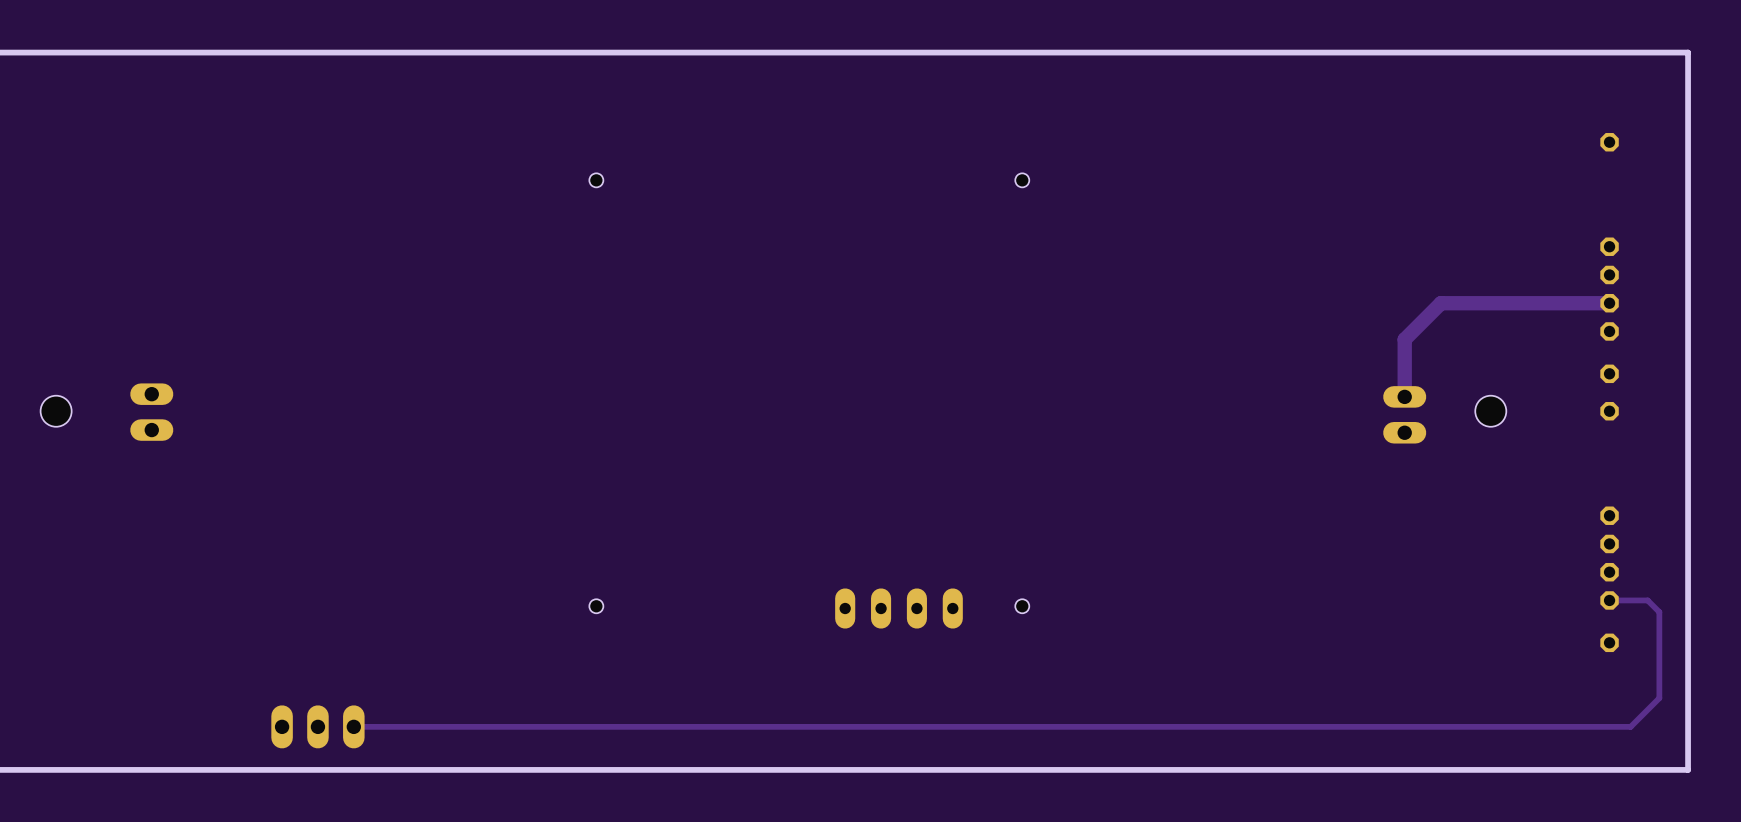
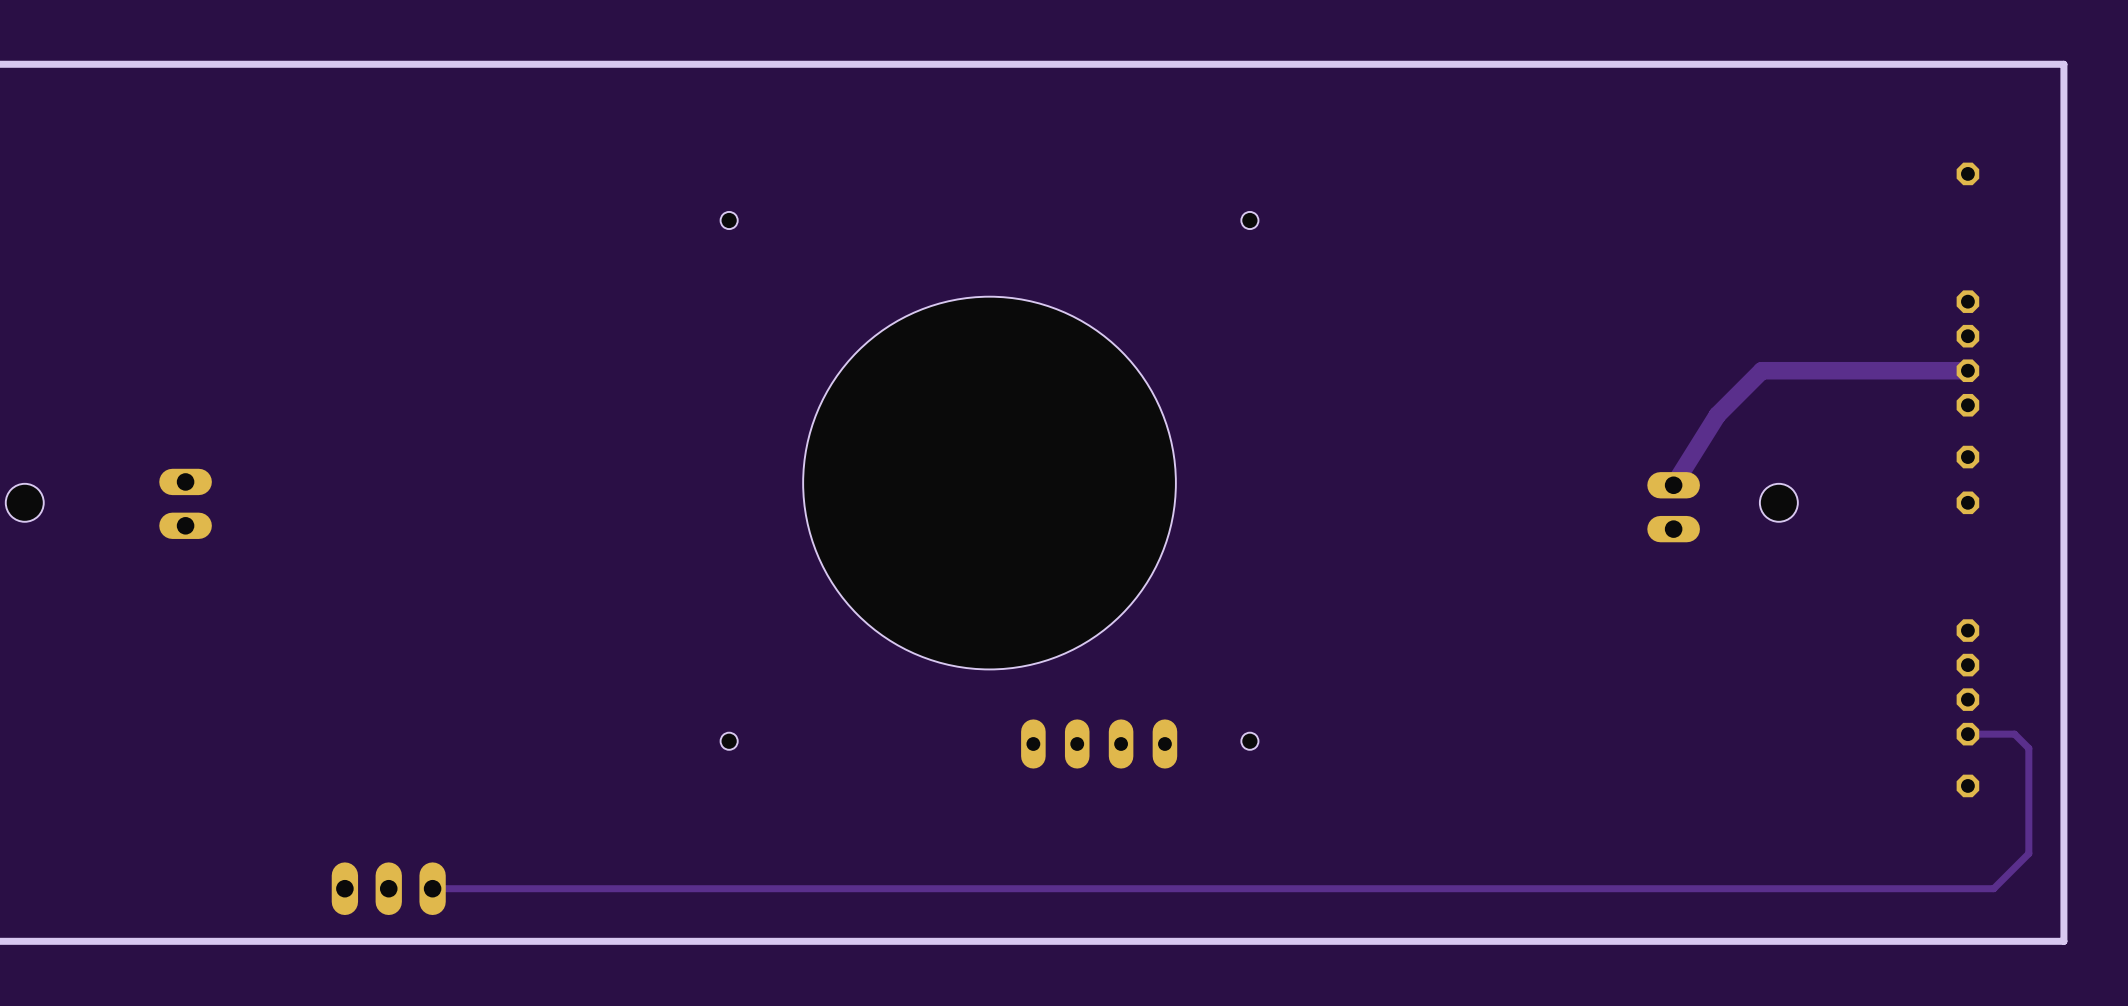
track: (1404, 339) (1404, 396) -> (1717, 415) (1673, 485)
hole: none -> (989, 483)
hole position: (56, 411) -> (24, 502)
hole position: (1490, 411) -> (1778, 502)
part position: (1404, 414) -> (1673, 507)

